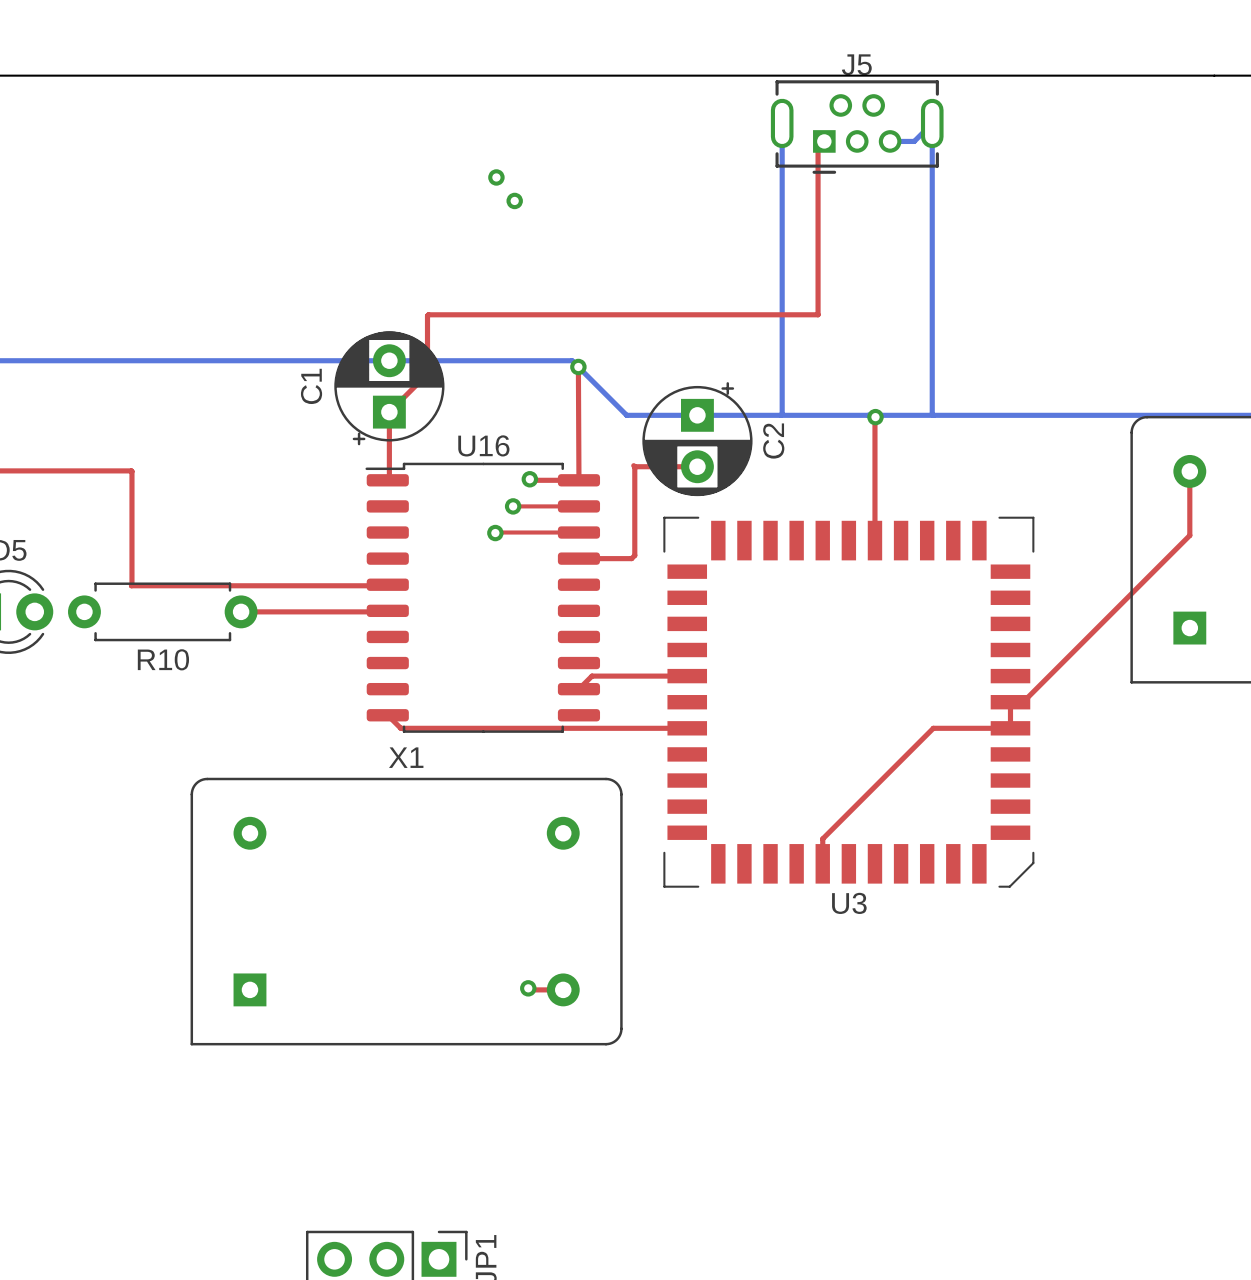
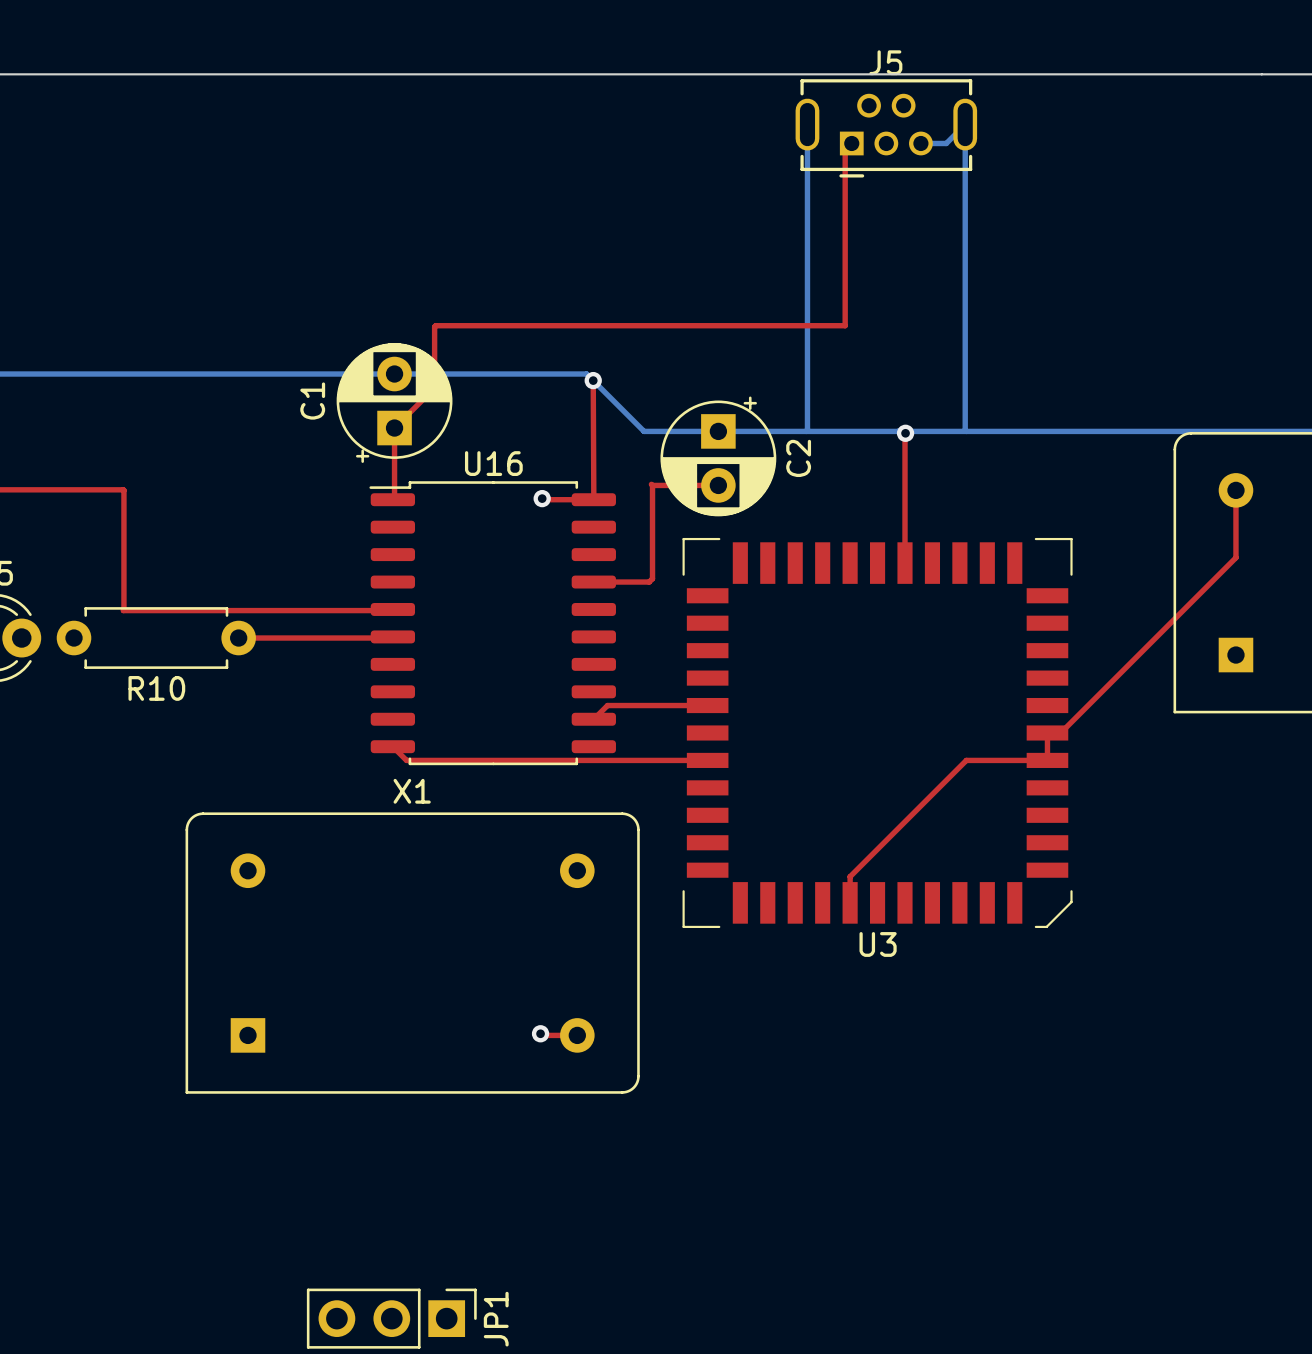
via: (496, 177) -> none
via: (514, 200) -> none
top track: (510, 506) (578, 506) -> none
via: (513, 506) -> none
top track: (491, 532) (578, 532) -> none
via: (495, 533) -> none

